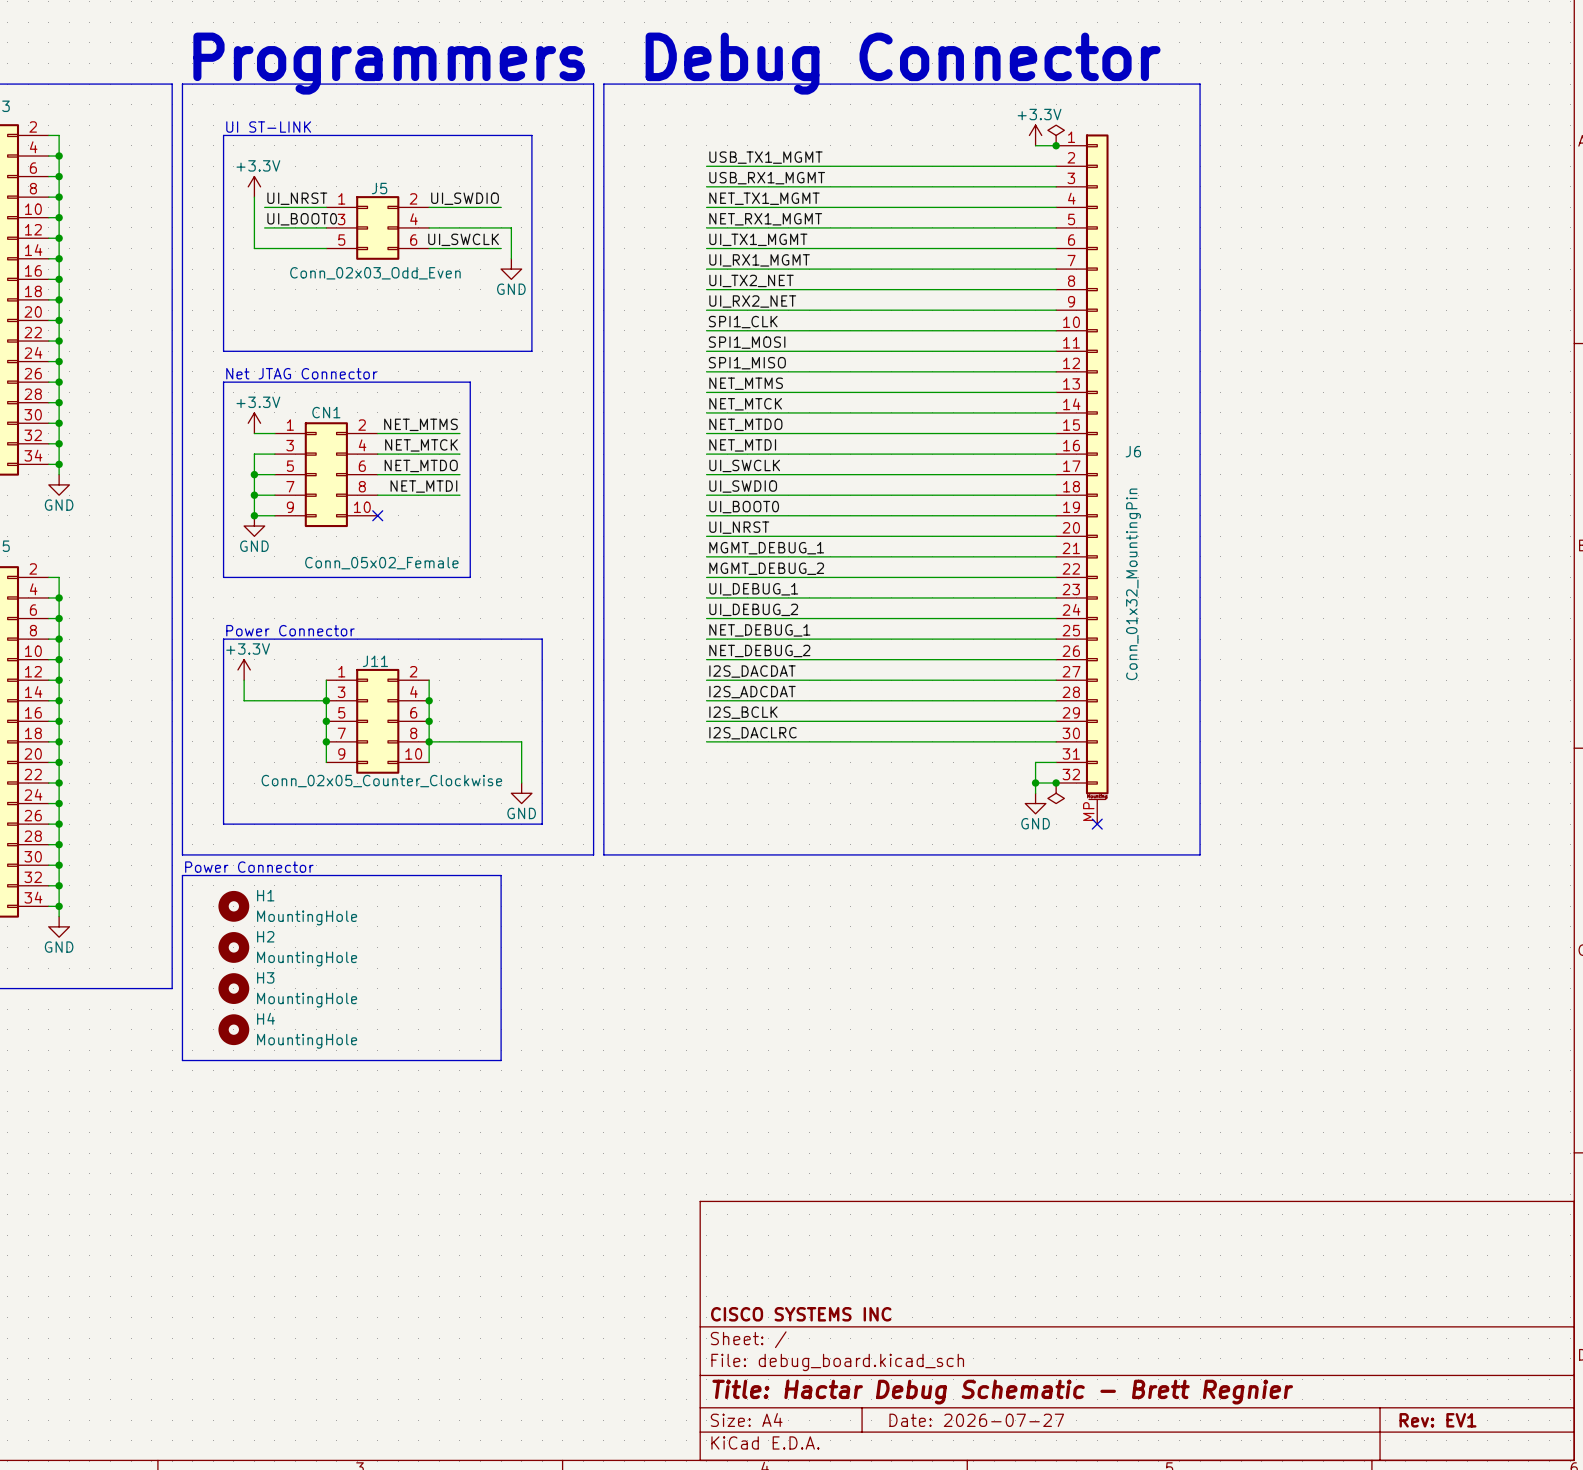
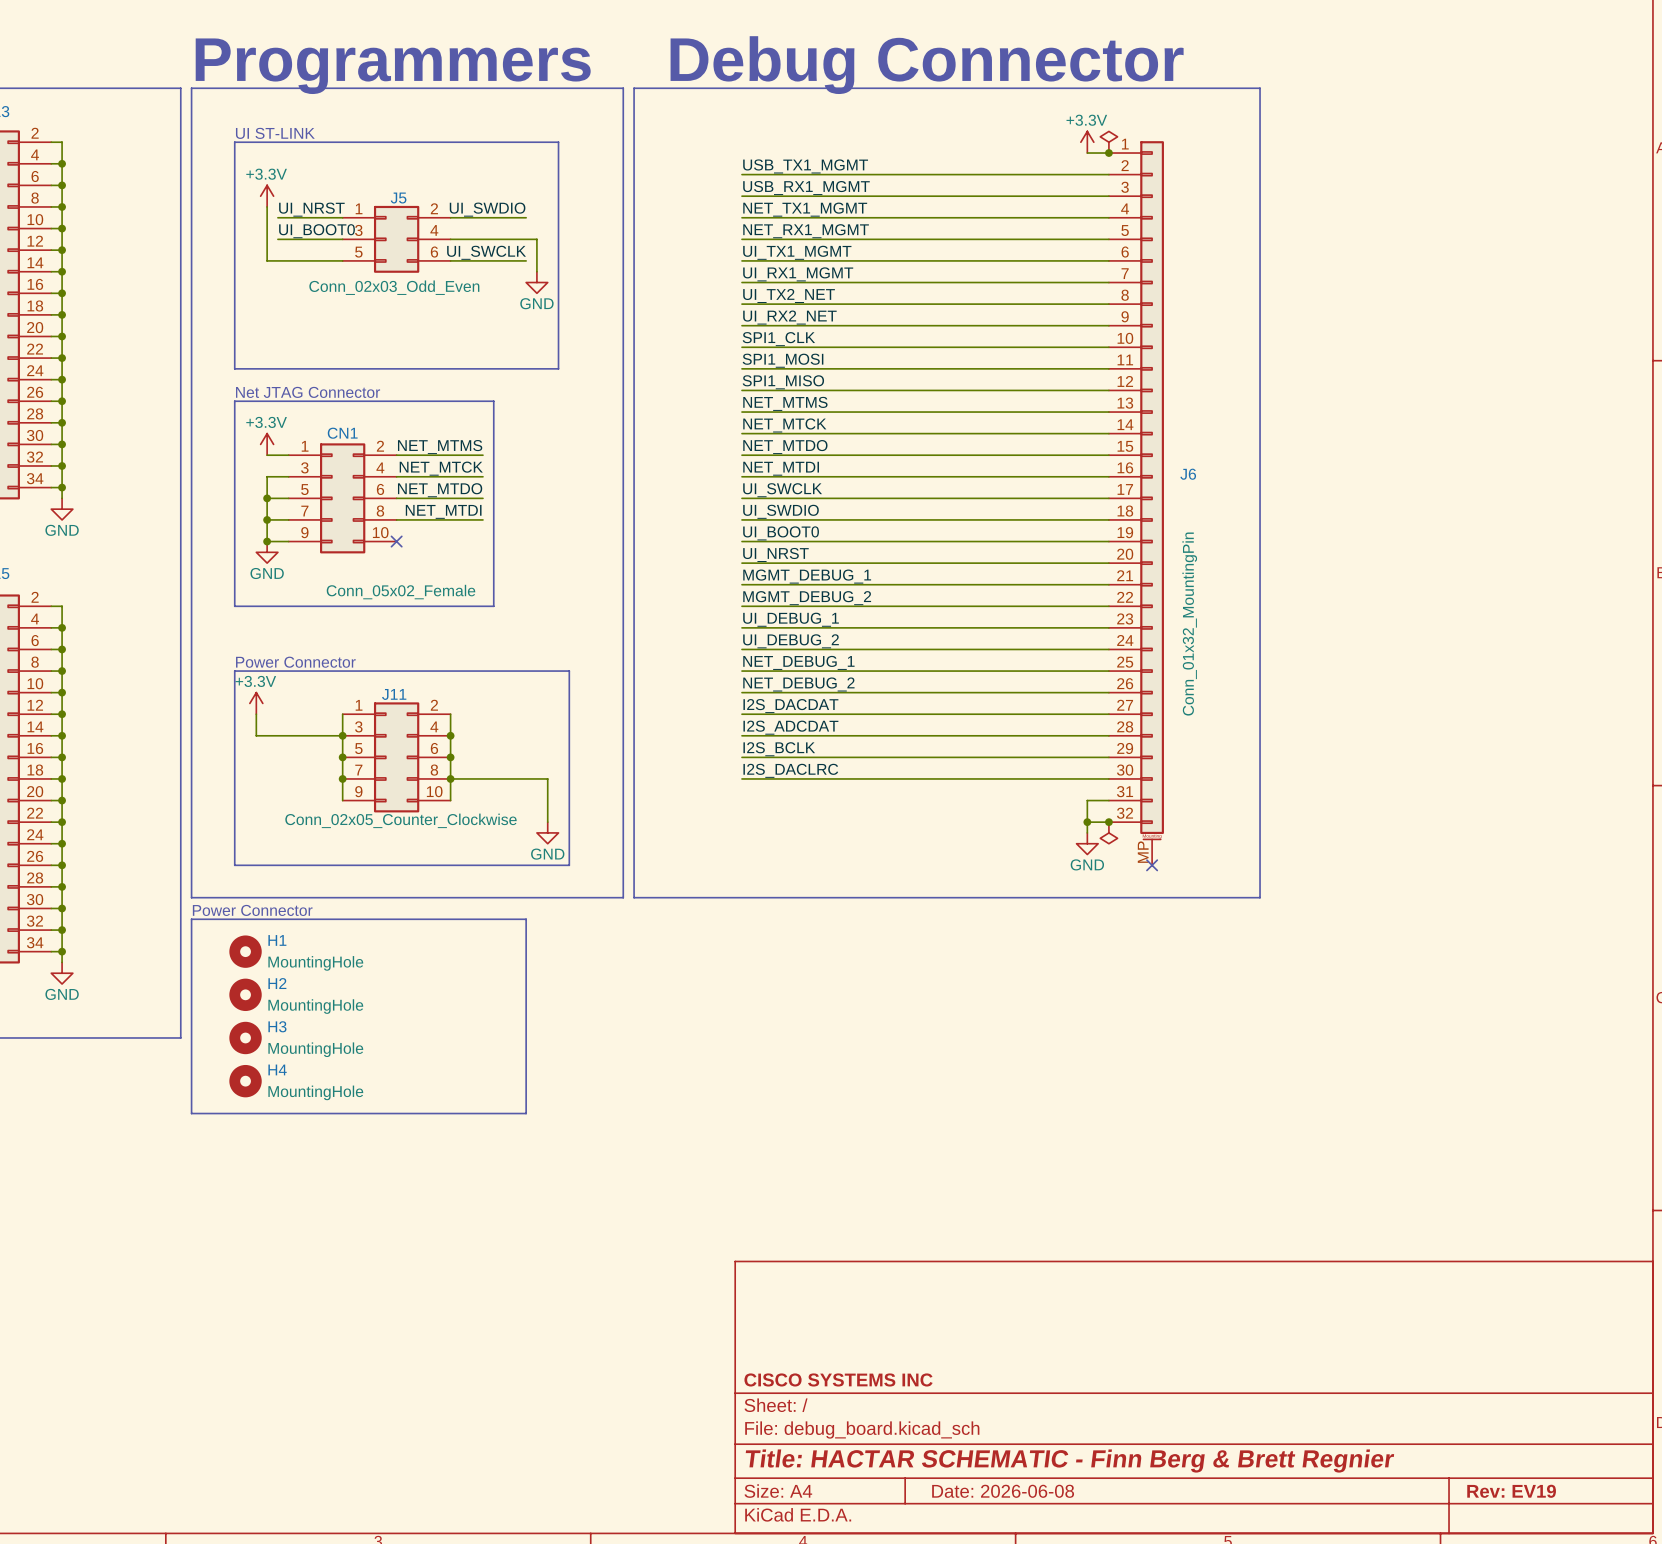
title block: Title: Hactar Debug Schematic - Brett Regnier (1002, 1392) -> Title: HACTAR SCHEMATIC - Finn Berg & Brett Regnier (1069, 1461)
title block: Date: 2026-07-27 (976, 1420) -> Date: 2026-06-08 (1003, 1491)
title block: Rev: EV1 (1437, 1420) -> Rev: EV19 (1511, 1491)

